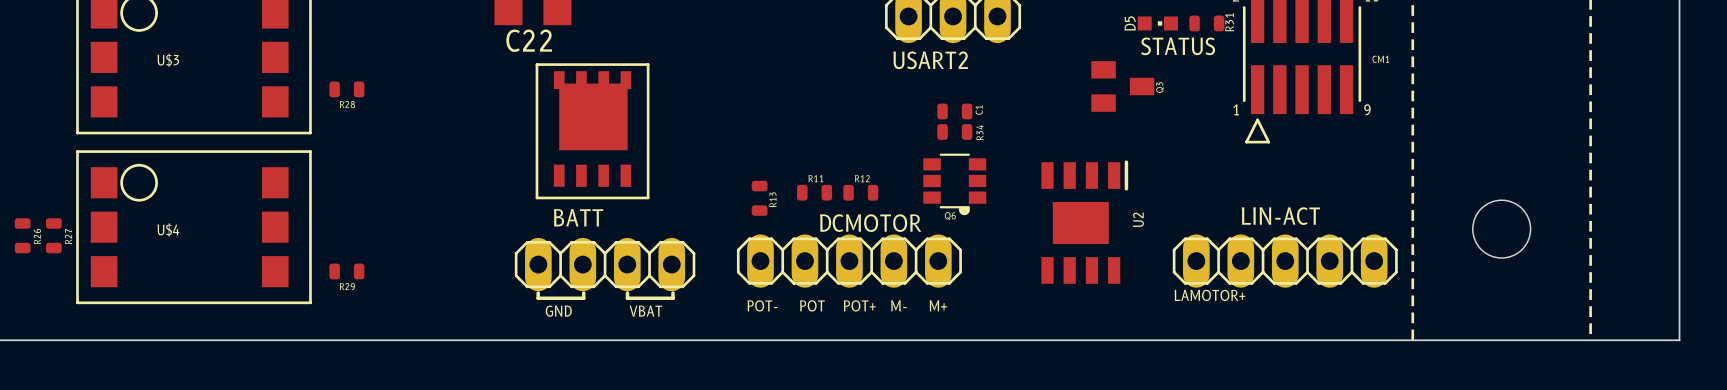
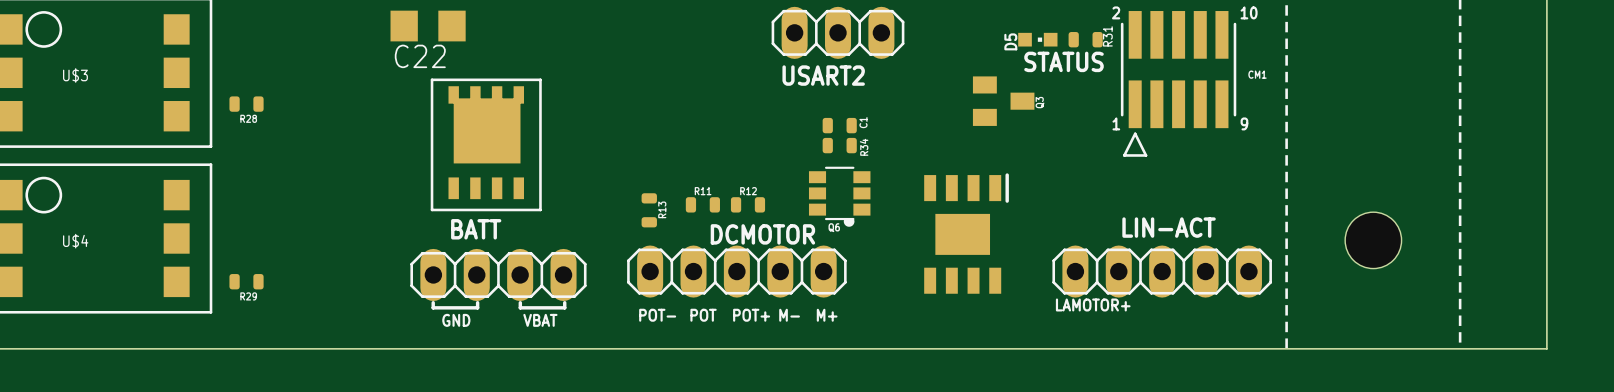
U2 name: U2 (1138, 219) -> none

